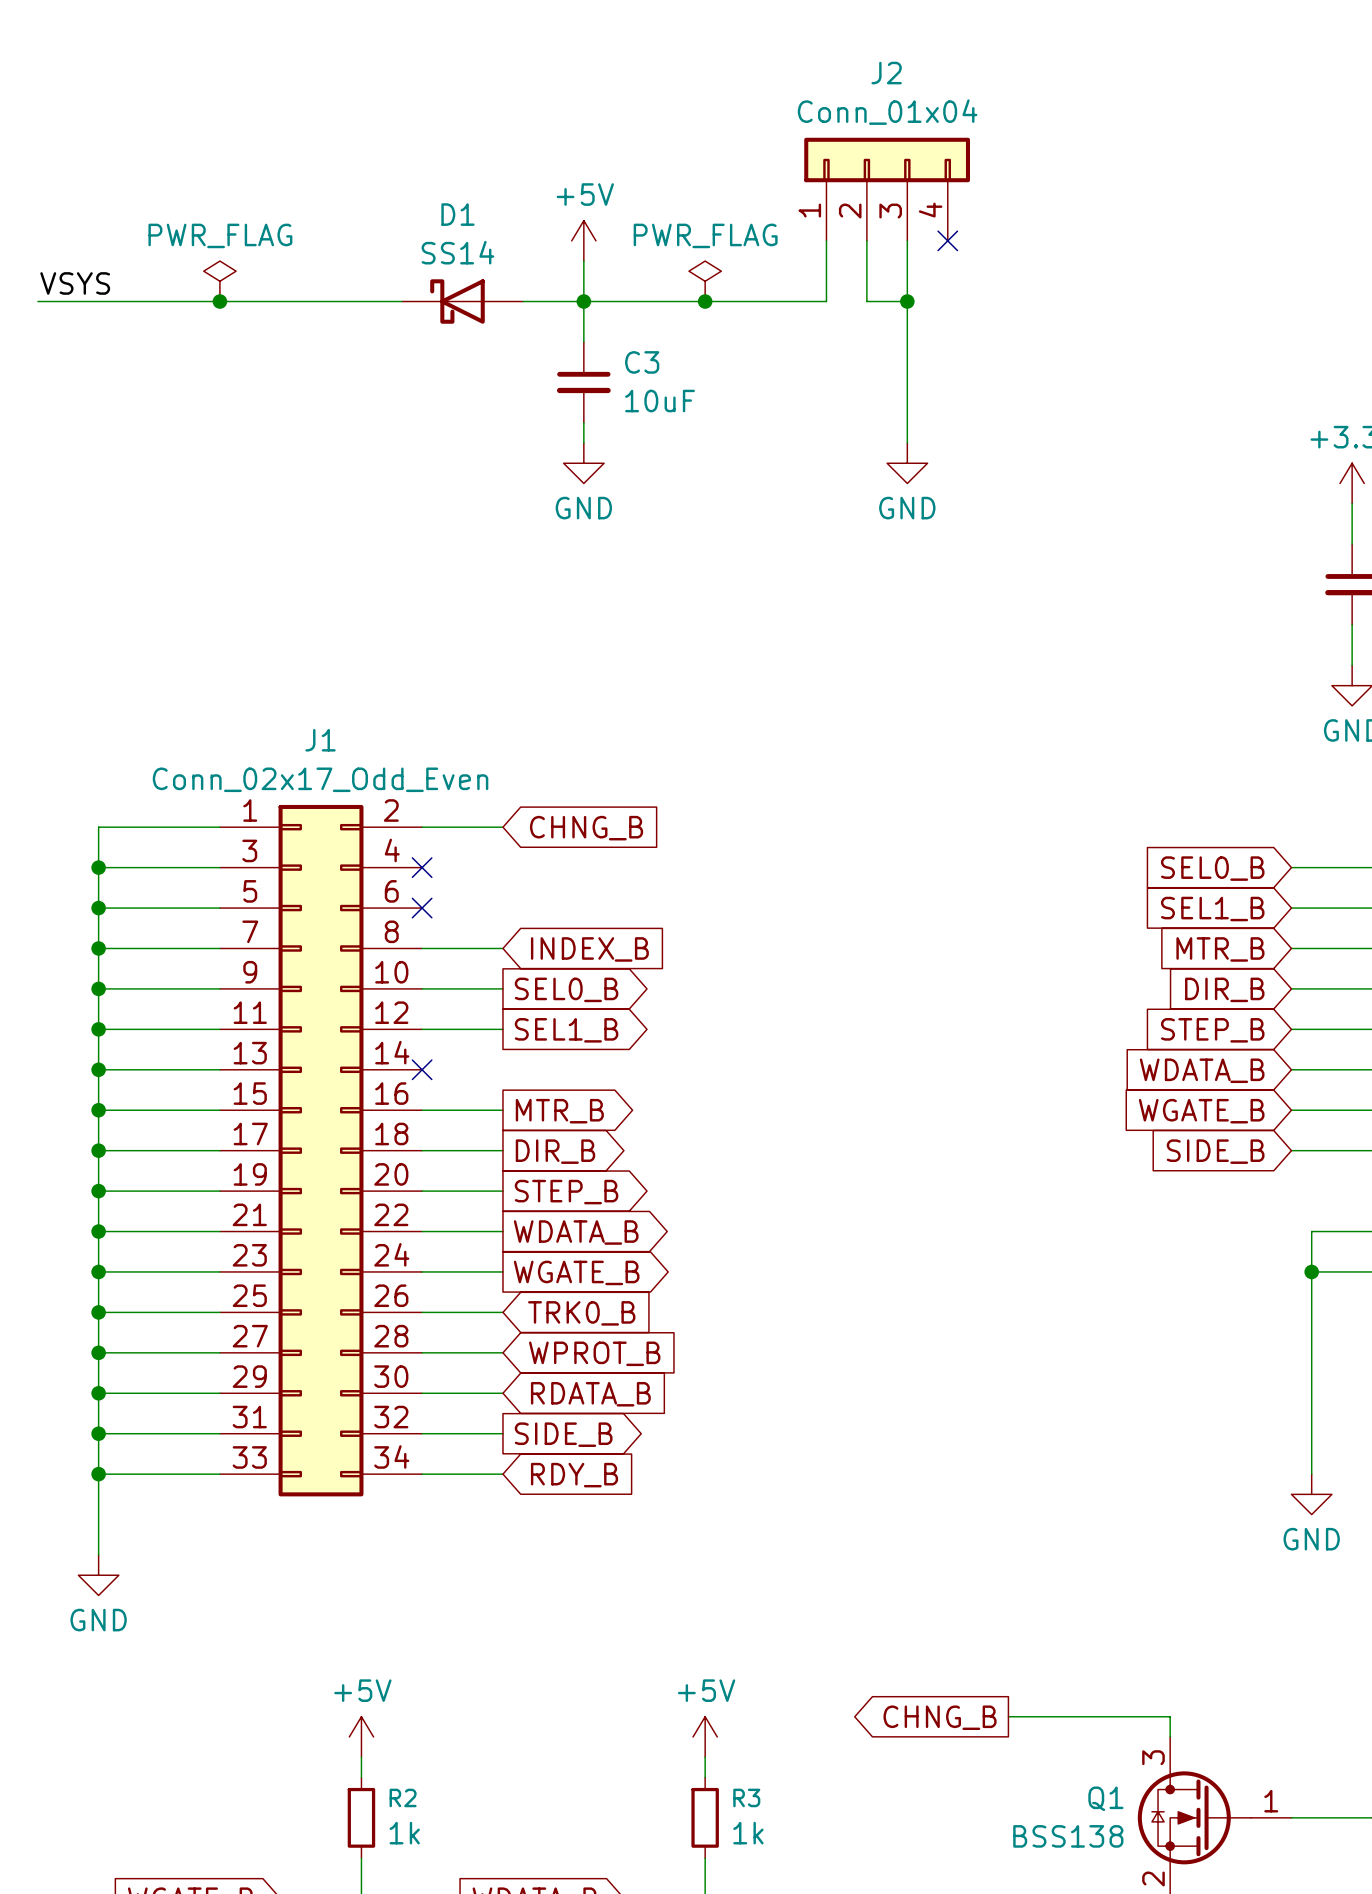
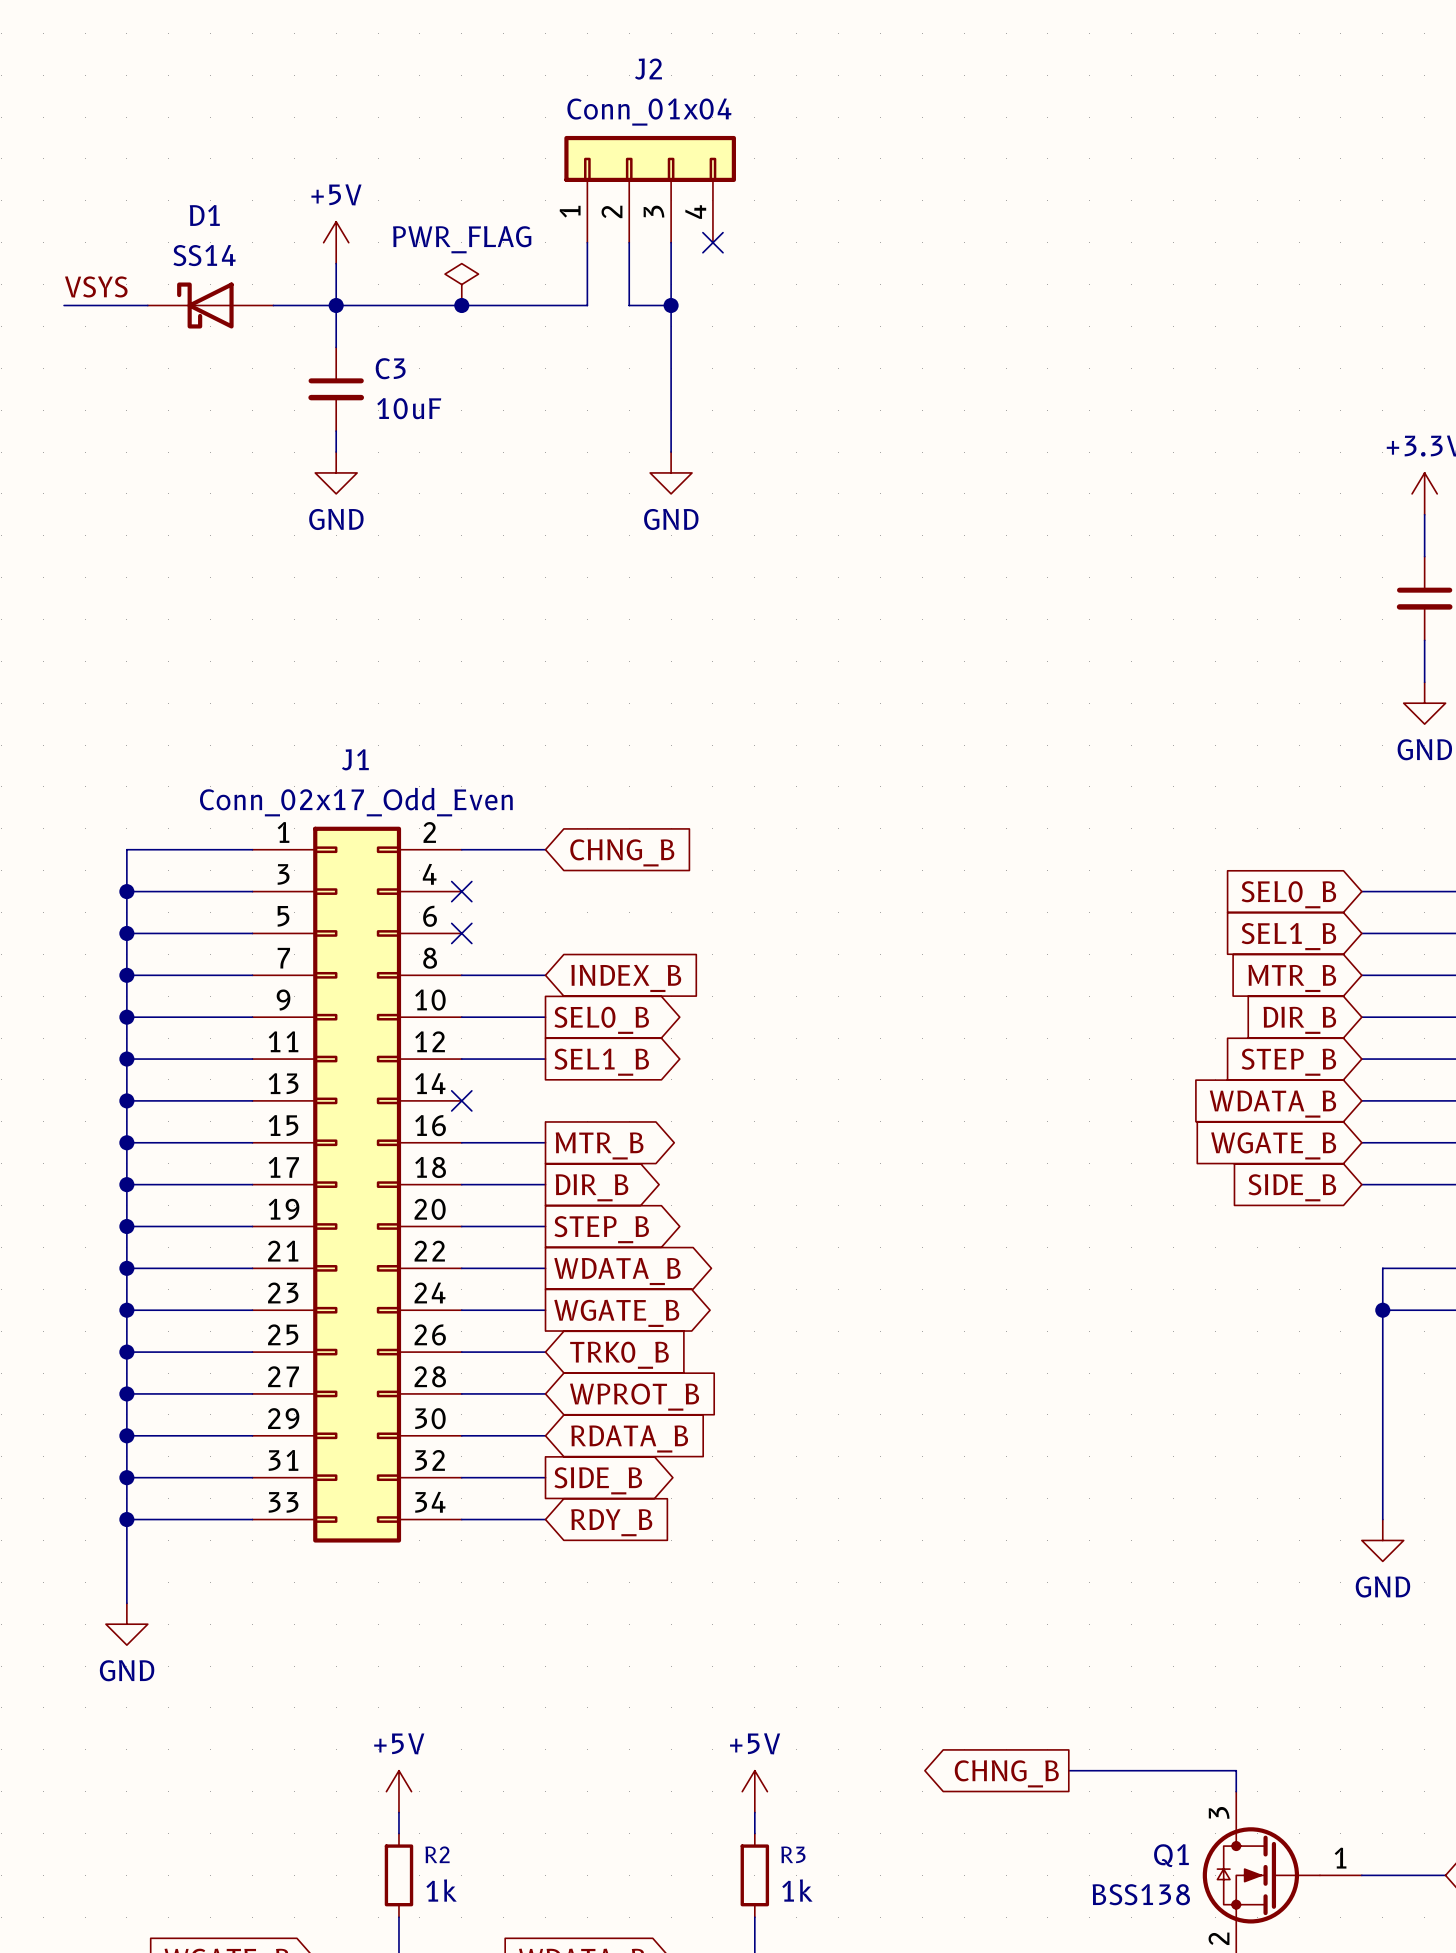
J2 position: (887, 189) -> (650, 189)
power symbol position: +5V (583, 240) -> +5V (336, 242)
no-connect mark: none -> (712, 242)
wire: (826, 240) (826, 301) (624, 301) -> none
wire: (866, 240) (866, 301) (907, 301) -> none
wire: (907, 240) (907, 443) -> (671, 242) (671, 452)
no-connect mark: (947, 240) -> none
wire: none -> (336, 263) (336, 347)
power symbol: PWR_FLAG (219, 281) -> none
power symbol: none -> PWR_FLAG (461, 284)
power symbol: PWR_FLAG (705, 281) -> none
junction position: (219, 301) -> (336, 305)
junction: none -> (461, 305)
D1 position: (462, 301) -> (210, 305)
wire: (543, 301) (583, 301) (583, 341) -> (587, 305) (587, 242)
junction: (583, 301) -> none
junction: none -> (671, 305)
junction: (705, 301) -> none
junction: (907, 301) -> none
C3 position: (583, 382) -> (336, 389)
wire: (583, 422) (583, 443) -> (336, 431) (336, 452)
power symbol: none -> GND (336, 472)
power symbol position: GND (583, 463) -> GND (671, 472)
power symbol: GND (907, 463) -> none

